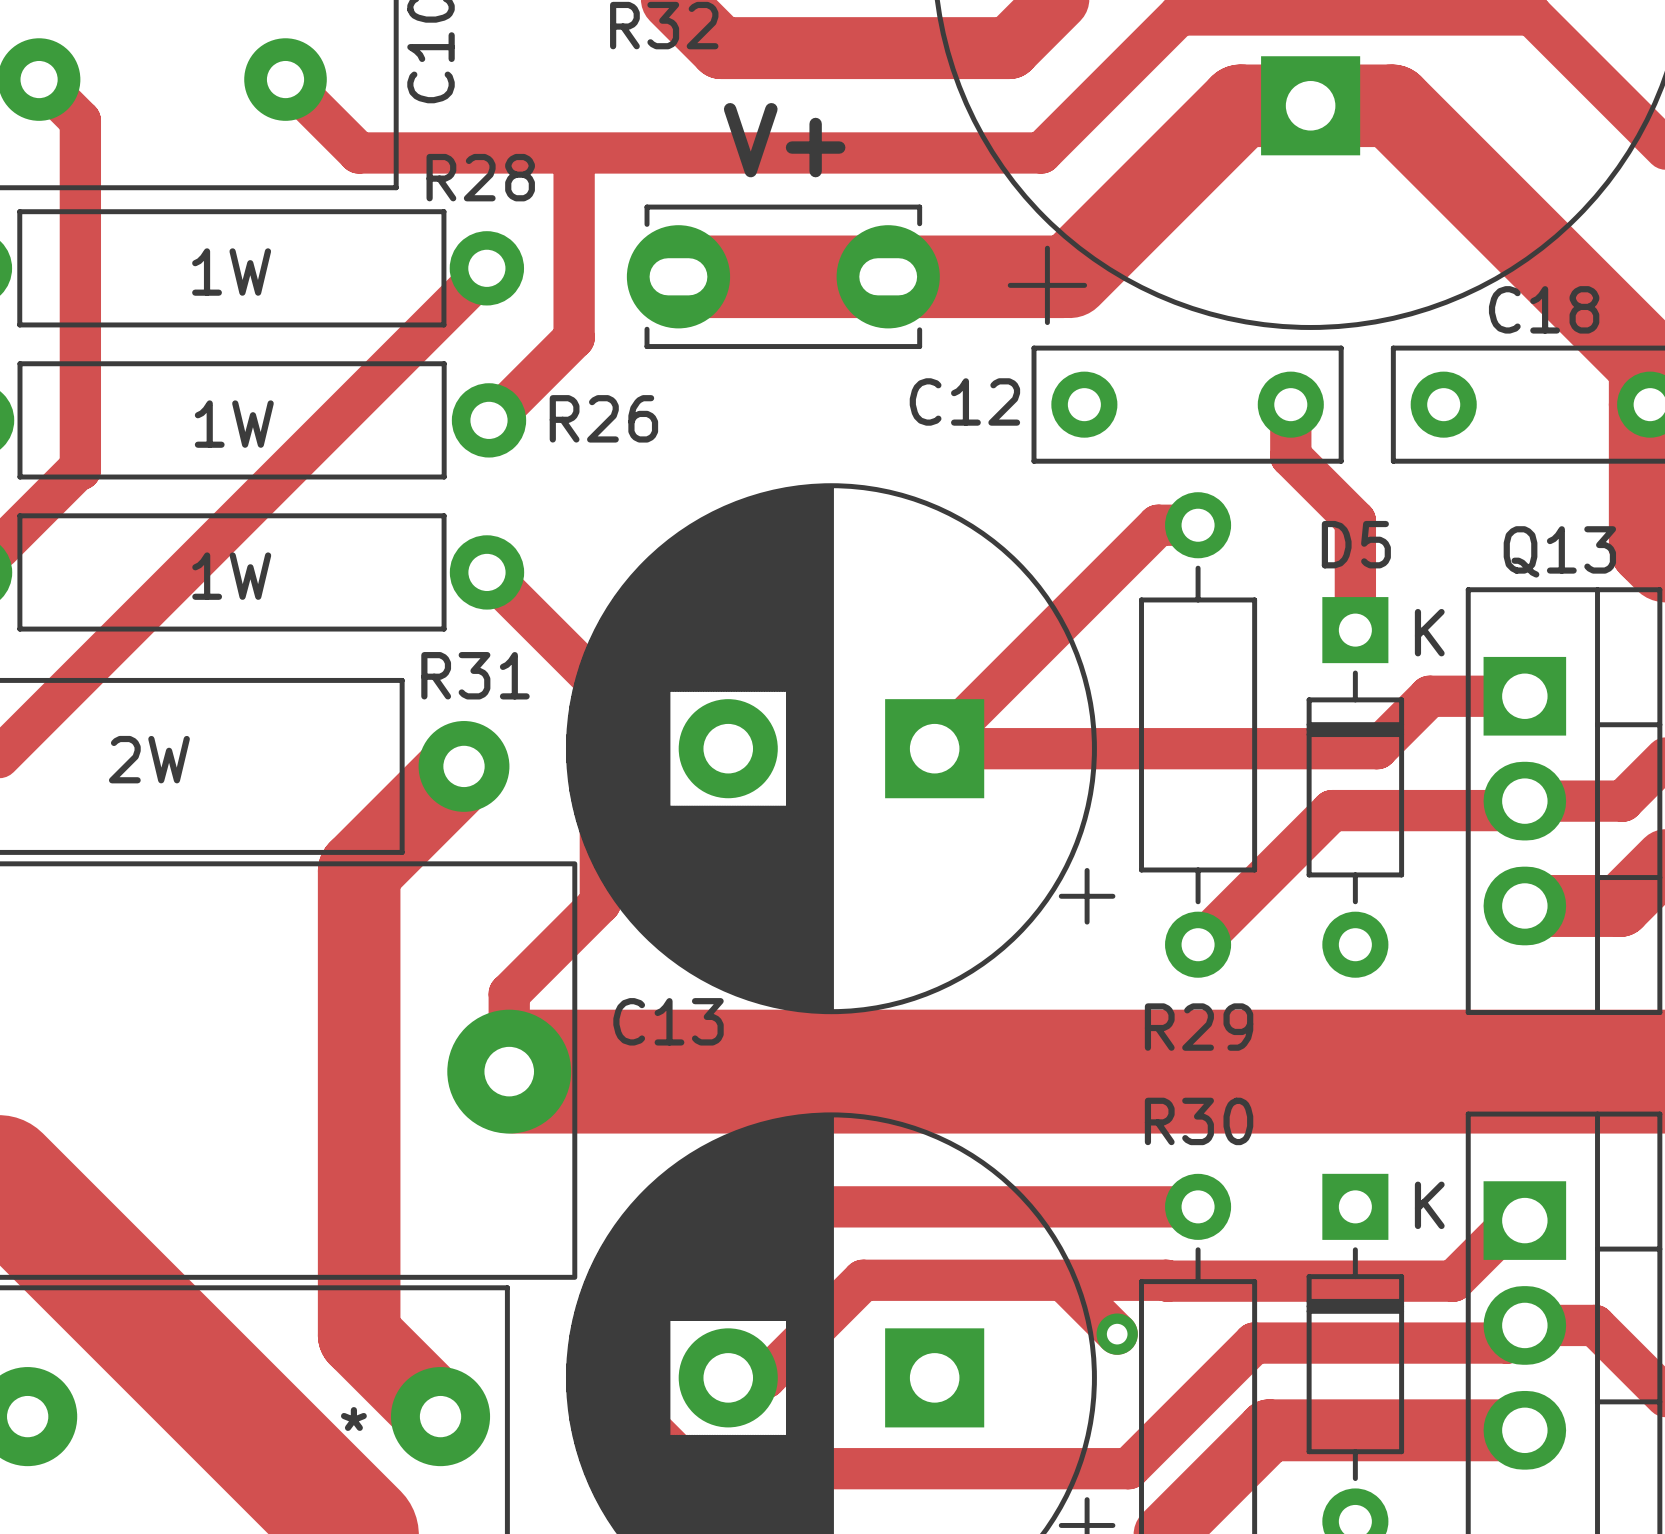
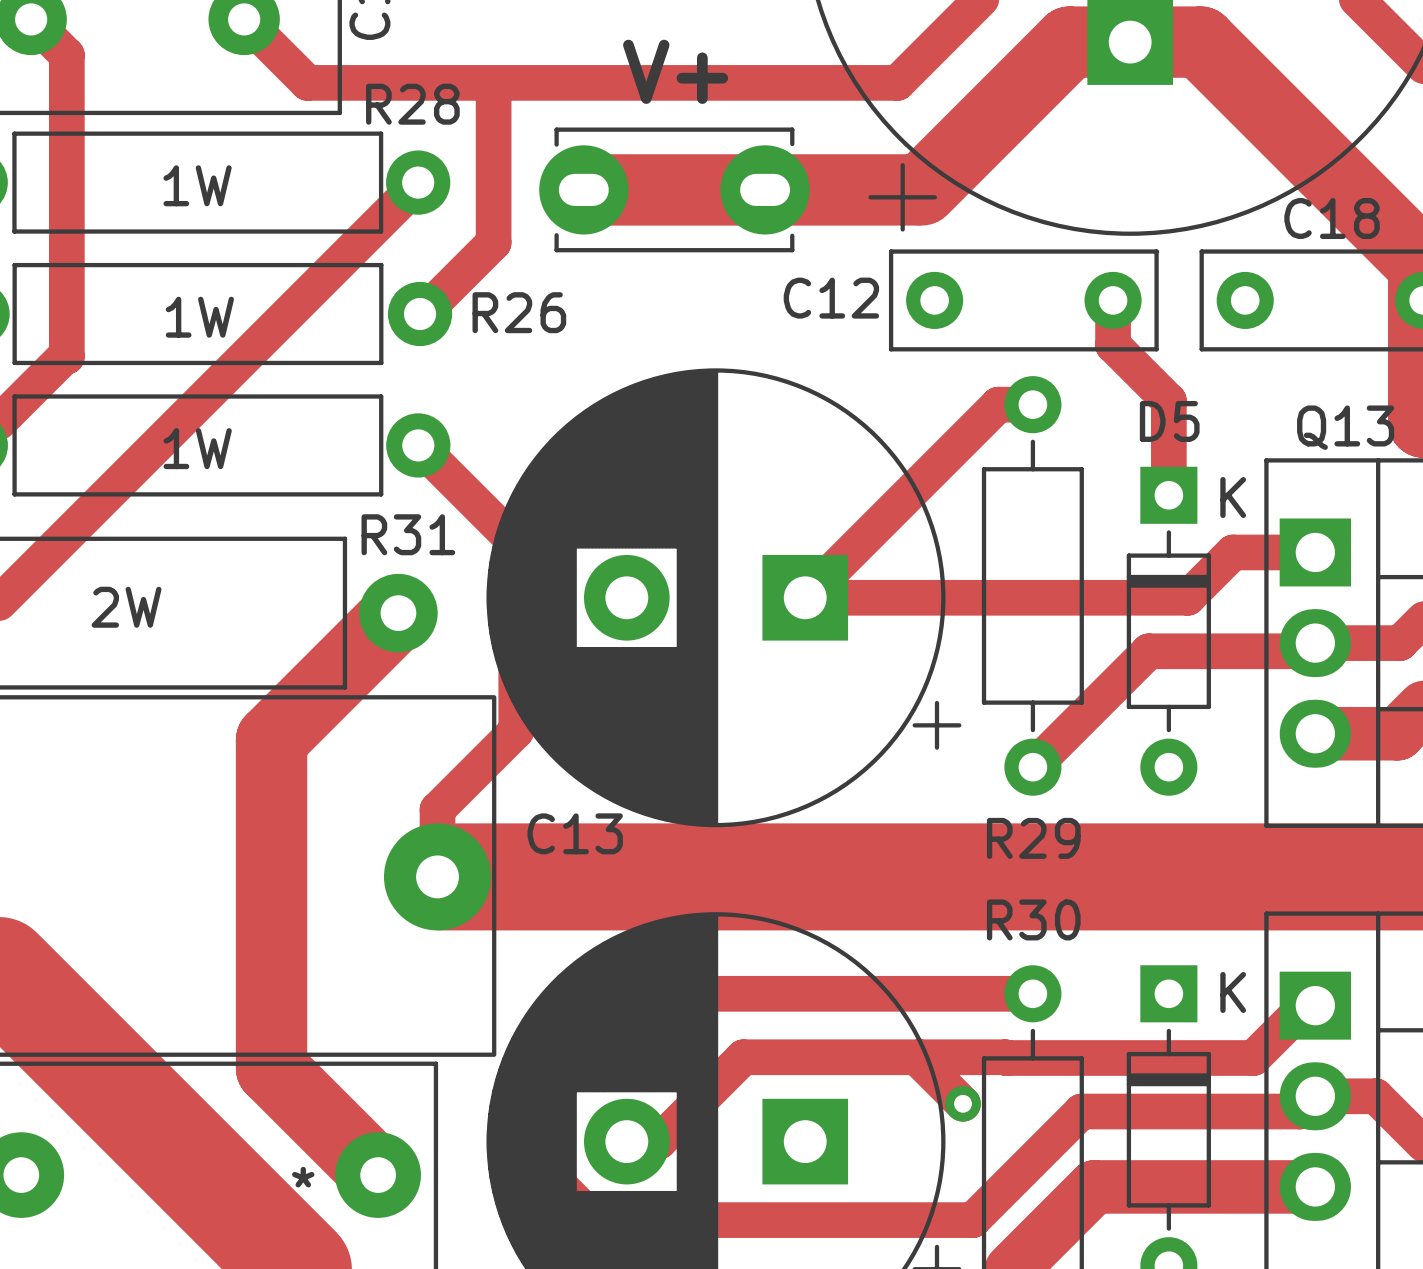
track: (359, 871) (359, 1335) -> (307, 703) (271, 740) (271, 1068) (307, 1104)

